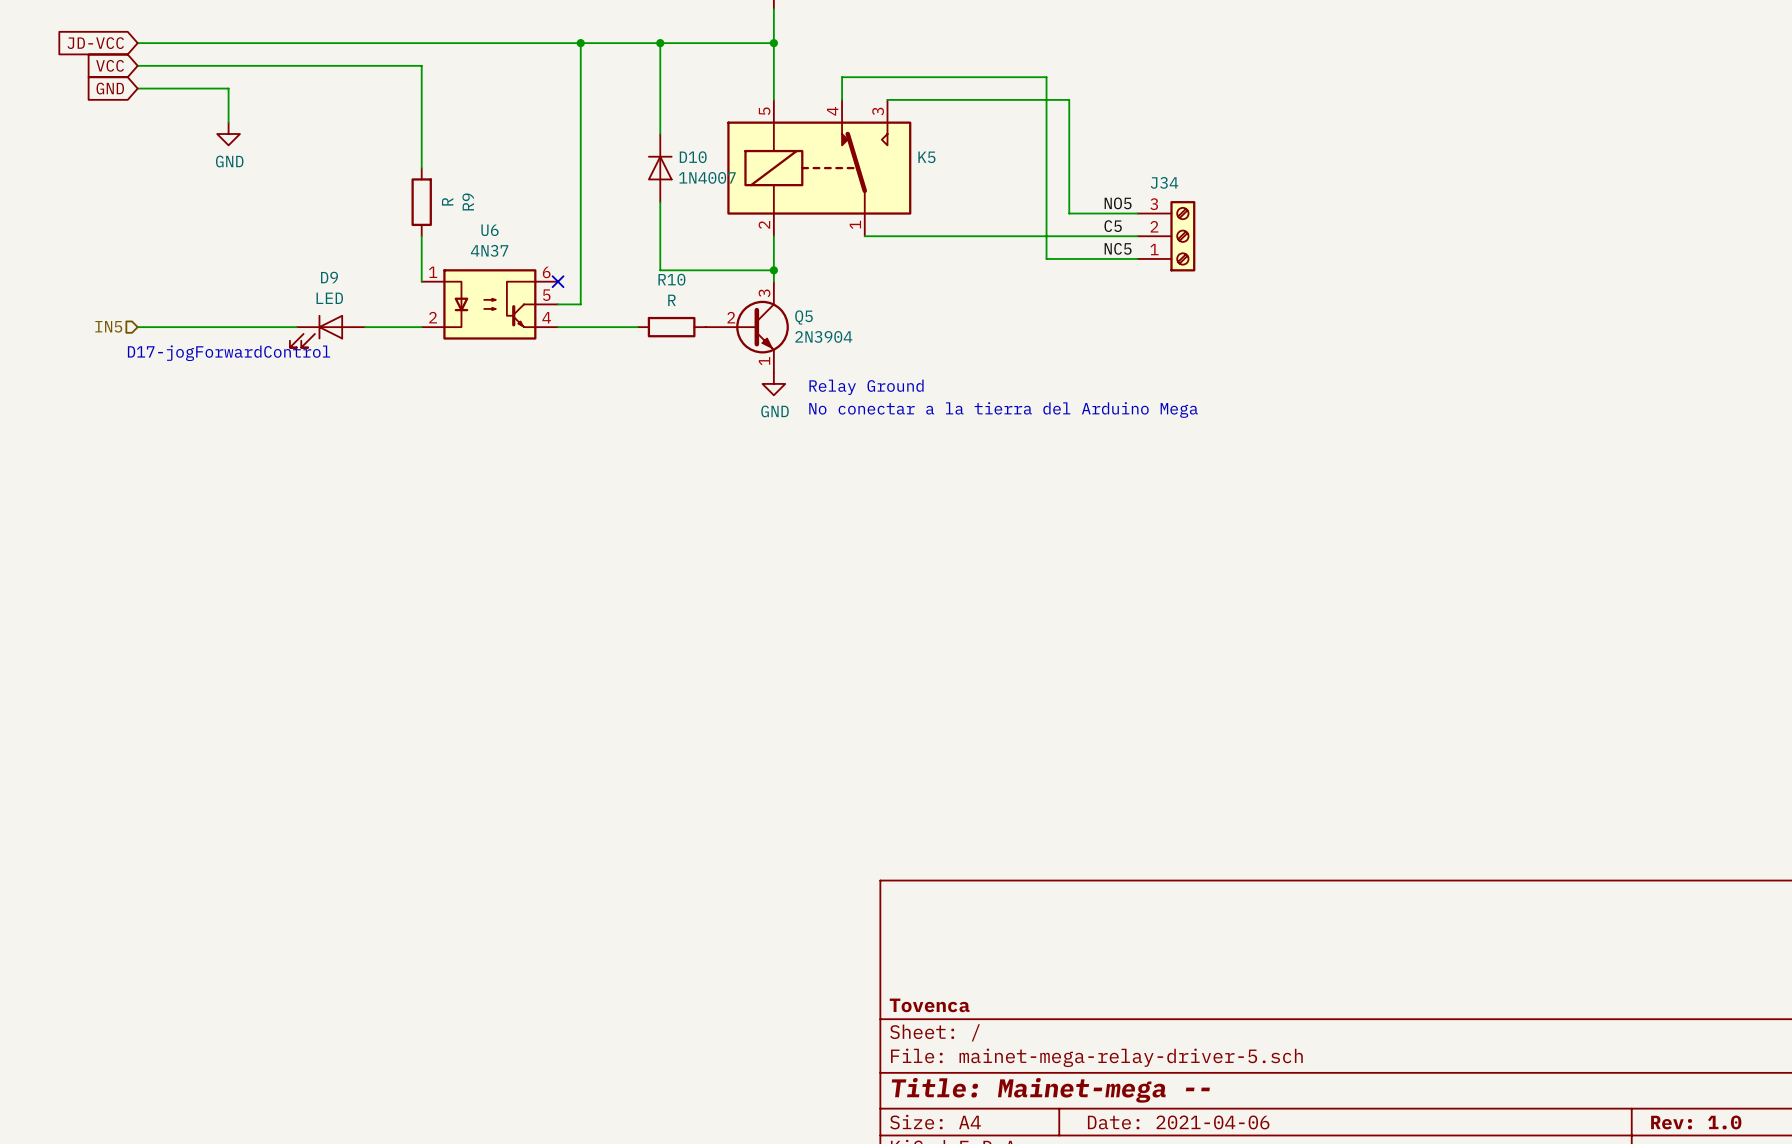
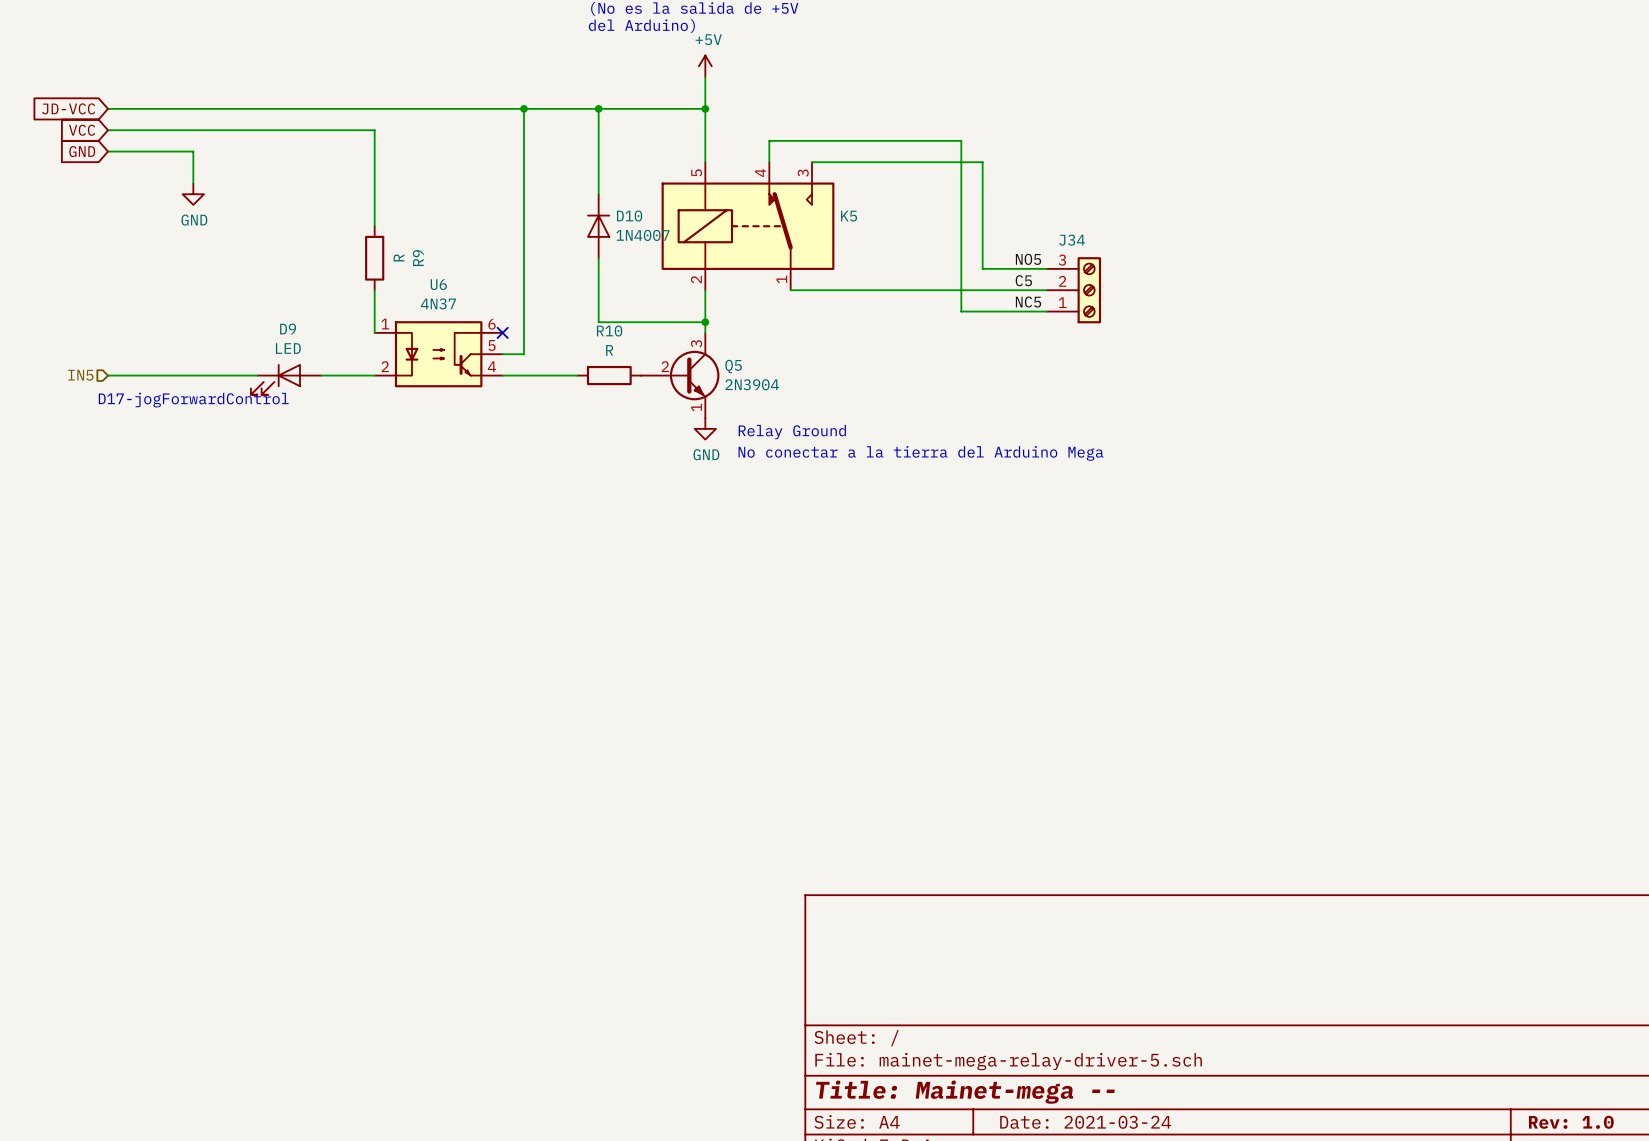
title block: Tovenca (929, 1005) -> none
title block: Date: 2021-04-06 (1178, 1122) -> Date: 2021-03-24 (1085, 1122)

